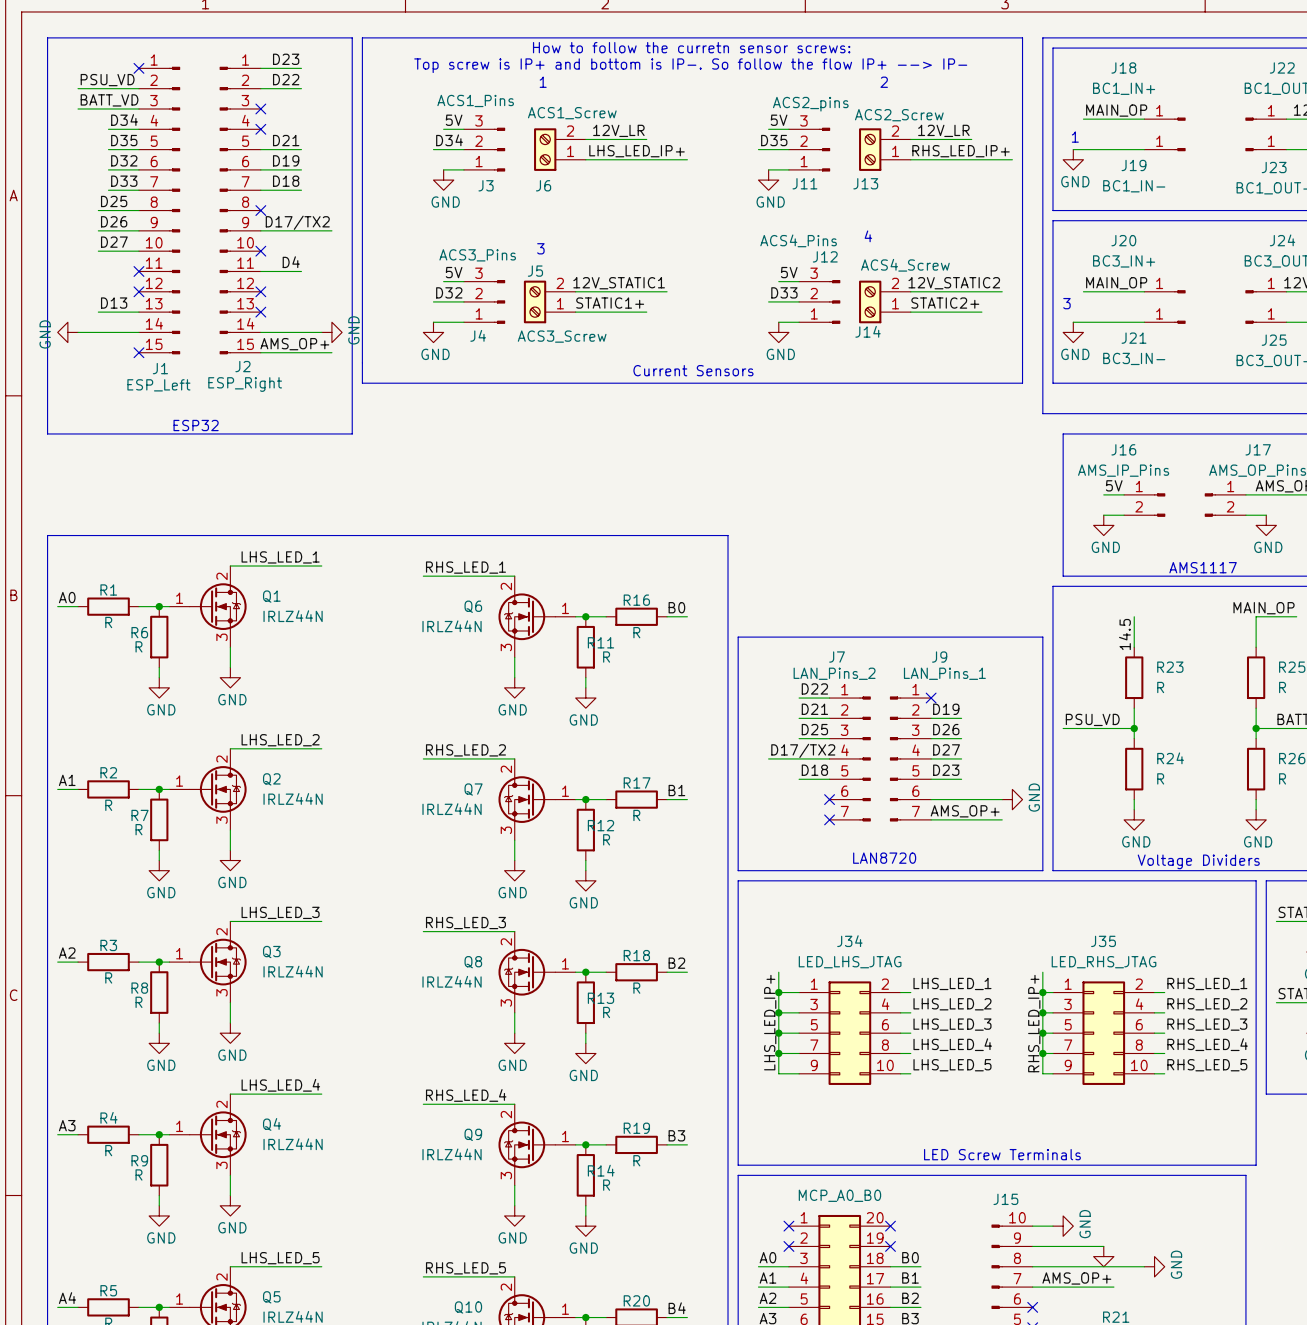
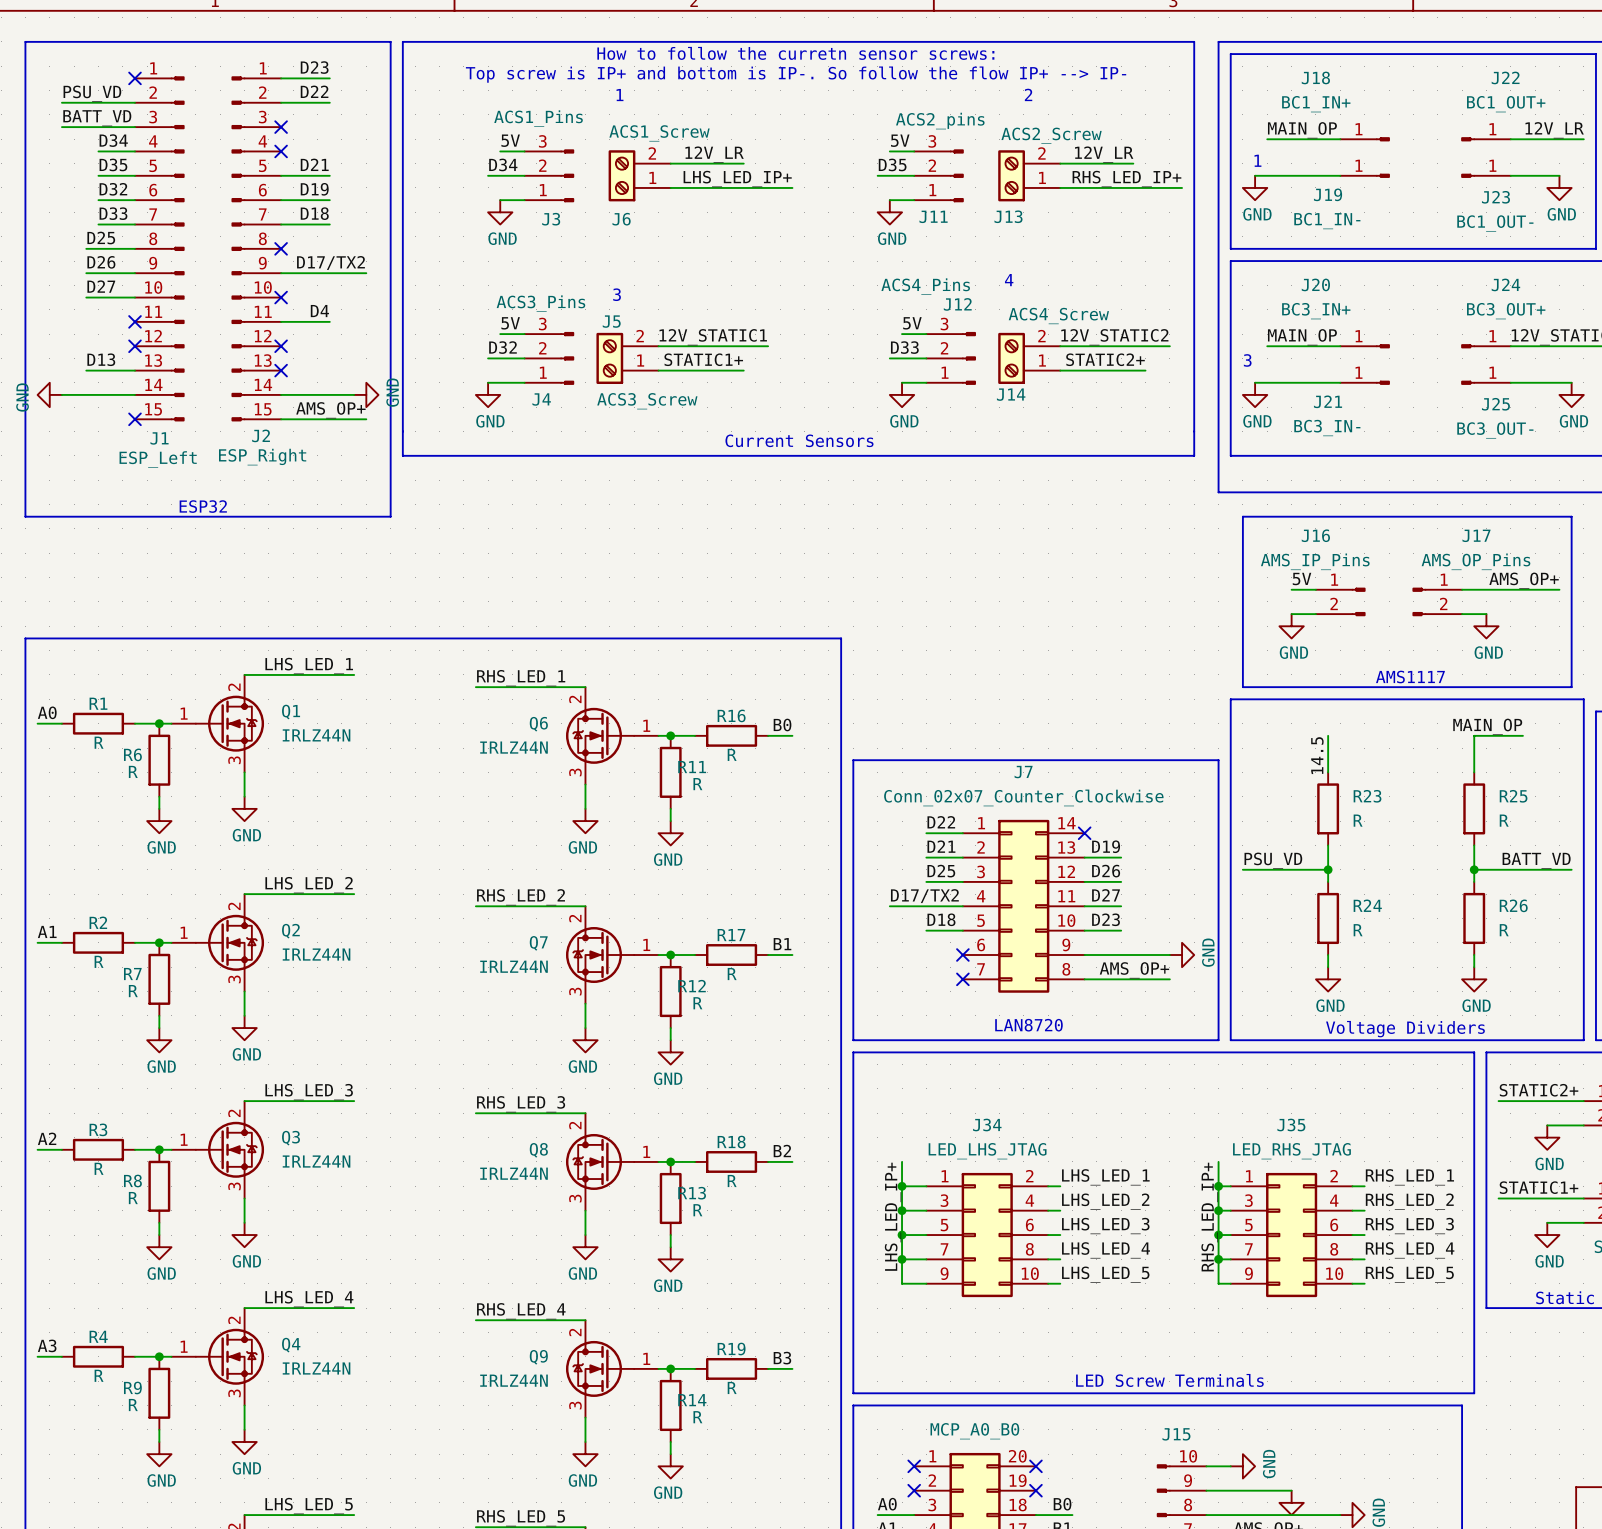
J7 value: LAN_Pins_2 (834, 673) -> Conn_02x07_Counter_Clockwise (1023, 797)
J7 symbol: [829, 696, 871, 822] -> [962, 819, 1085, 993]
J9: LAN_Pins_1 (910, 758) -> none

